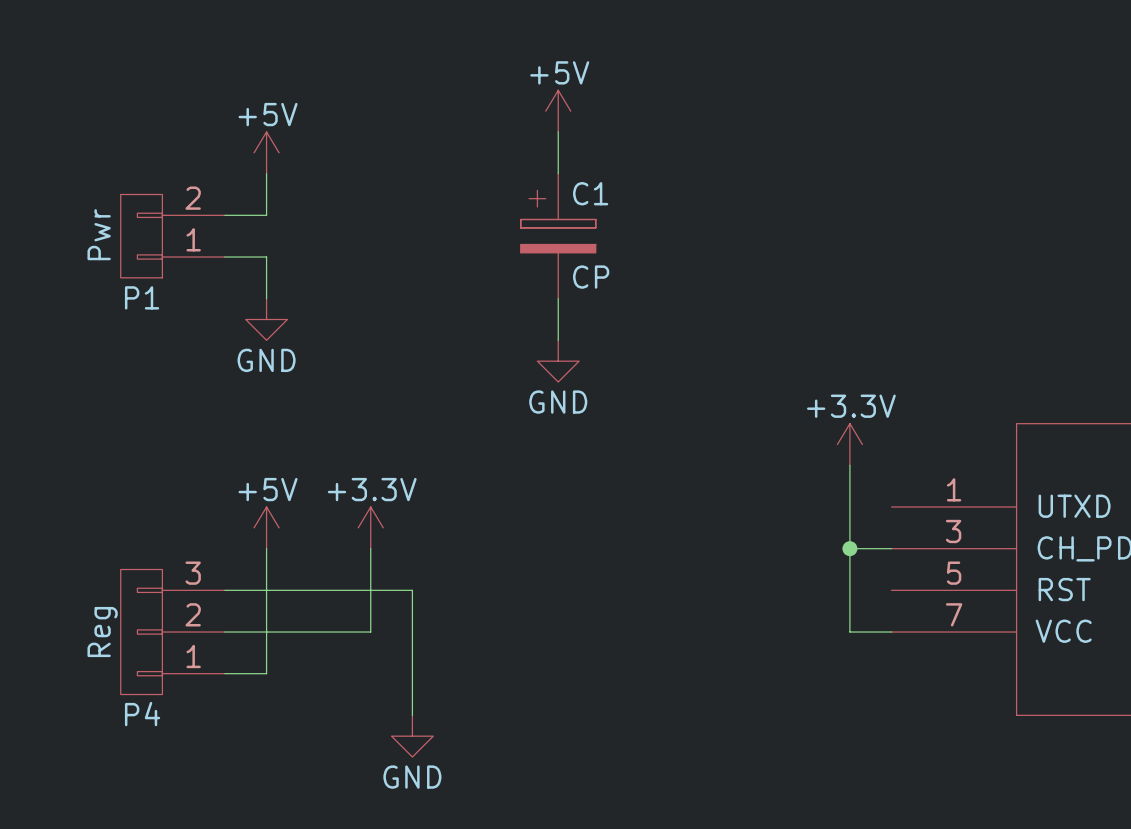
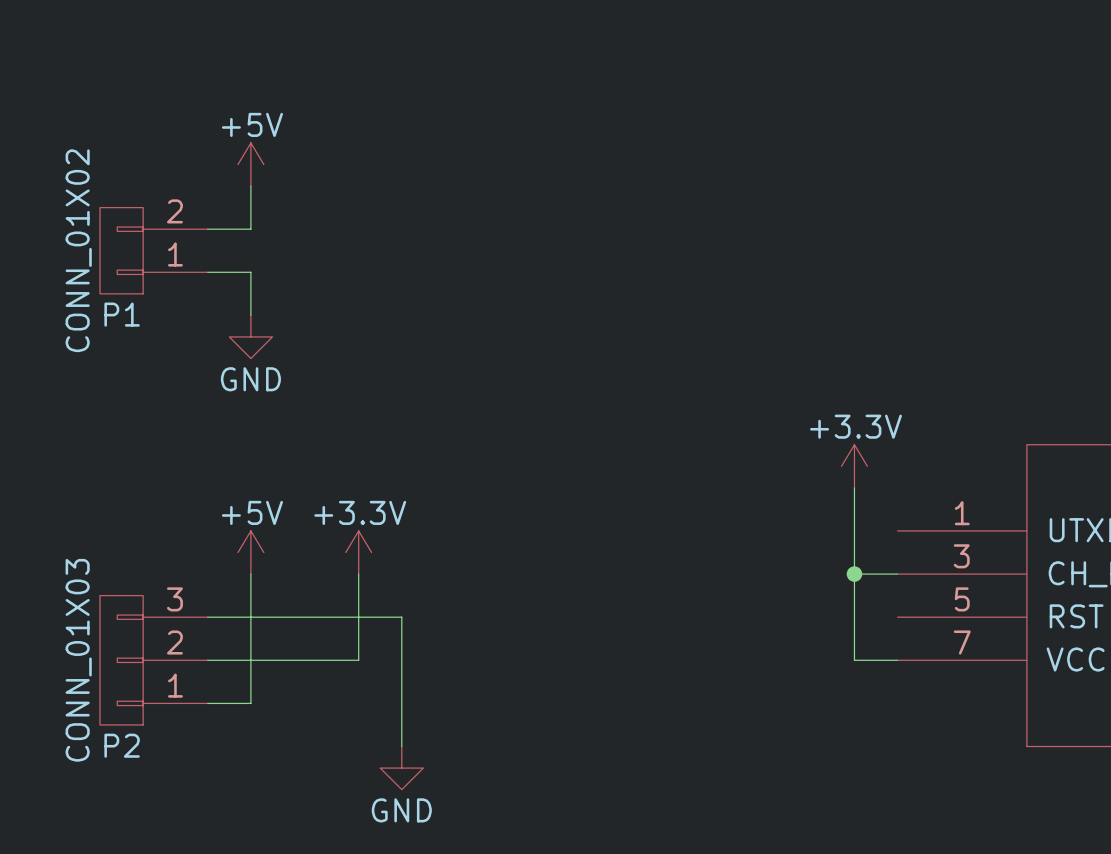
power symbol: +5V (558, 111) -> none
wire: (558, 132) (558, 173) -> none
P1 value: Pwr (99, 234) -> CONN_01X02 (78, 250)
C1: CP (558, 236) -> none
wire: (558, 298) (558, 340) -> none
power symbol: GND (558, 361) -> none
P4 value: Reg (102, 632) -> CONN_01X03 (78, 660)
P4 name: P4 (142, 714) -> P2 (122, 745)

